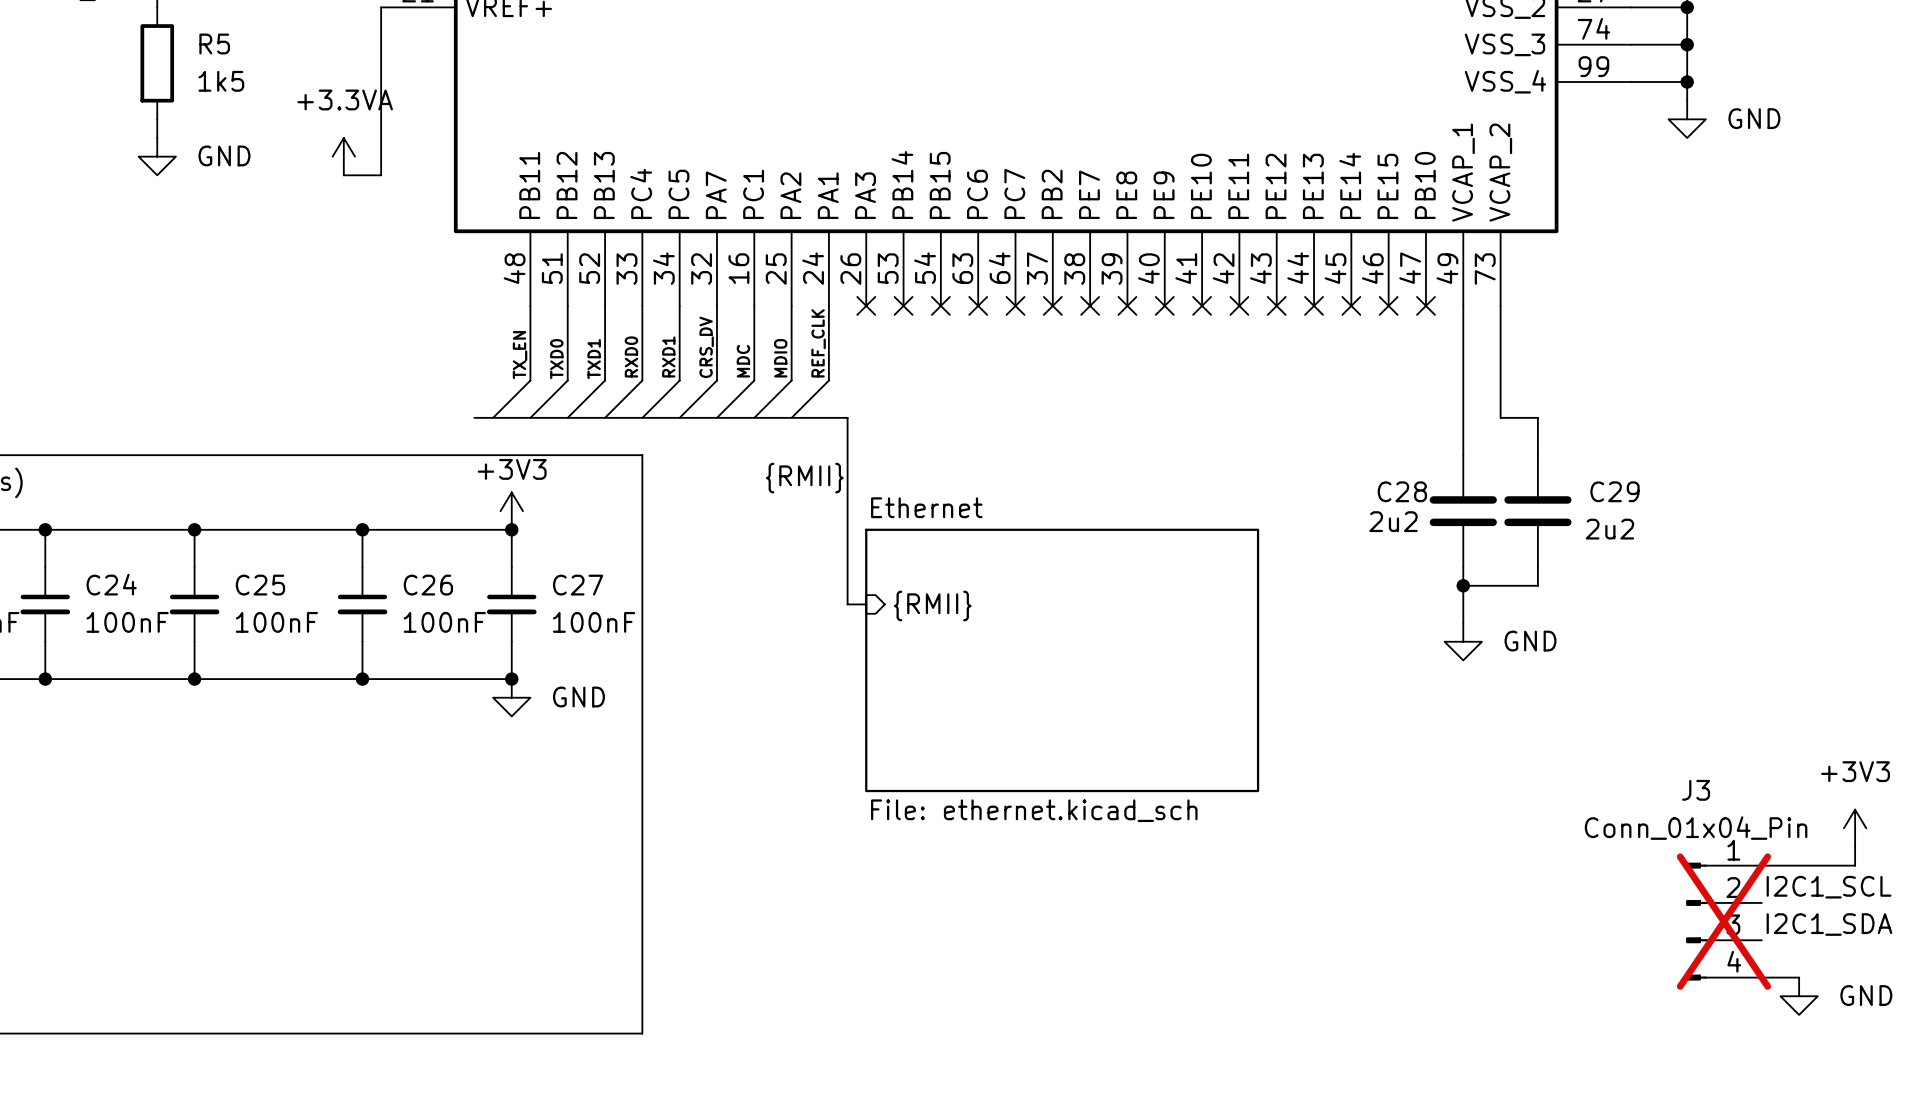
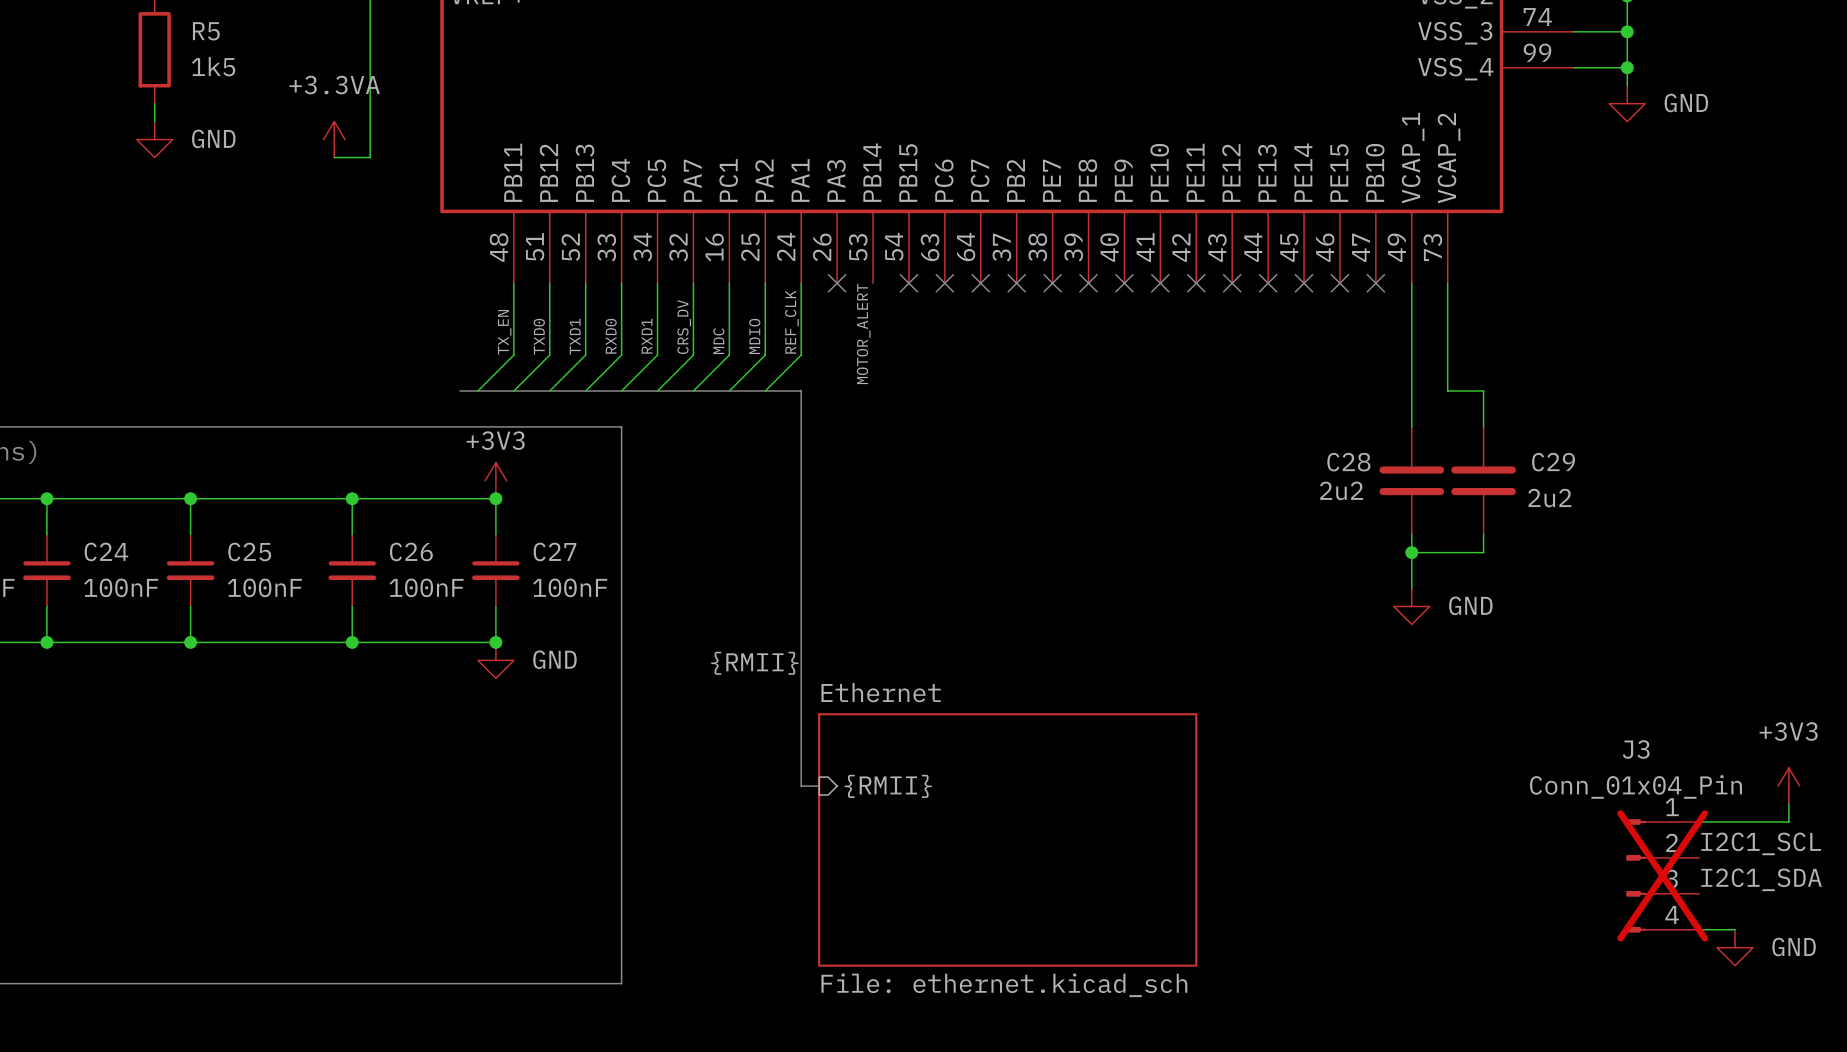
no-connect mark: (903, 305) -> none
label: none -> MOTOR_ALERT (863, 333)
bus: (828, 417) (847, 417) (847, 604) (866, 604) -> (801, 391) (801, 786) (819, 786)
label position: {RMII} (804, 478) -> {RMII} (754, 663)
sheet pin position: {RMII} (932, 605) -> {RMII} (888, 786)
sheet Ethernet position: (1062, 660) -> (1007, 839)

